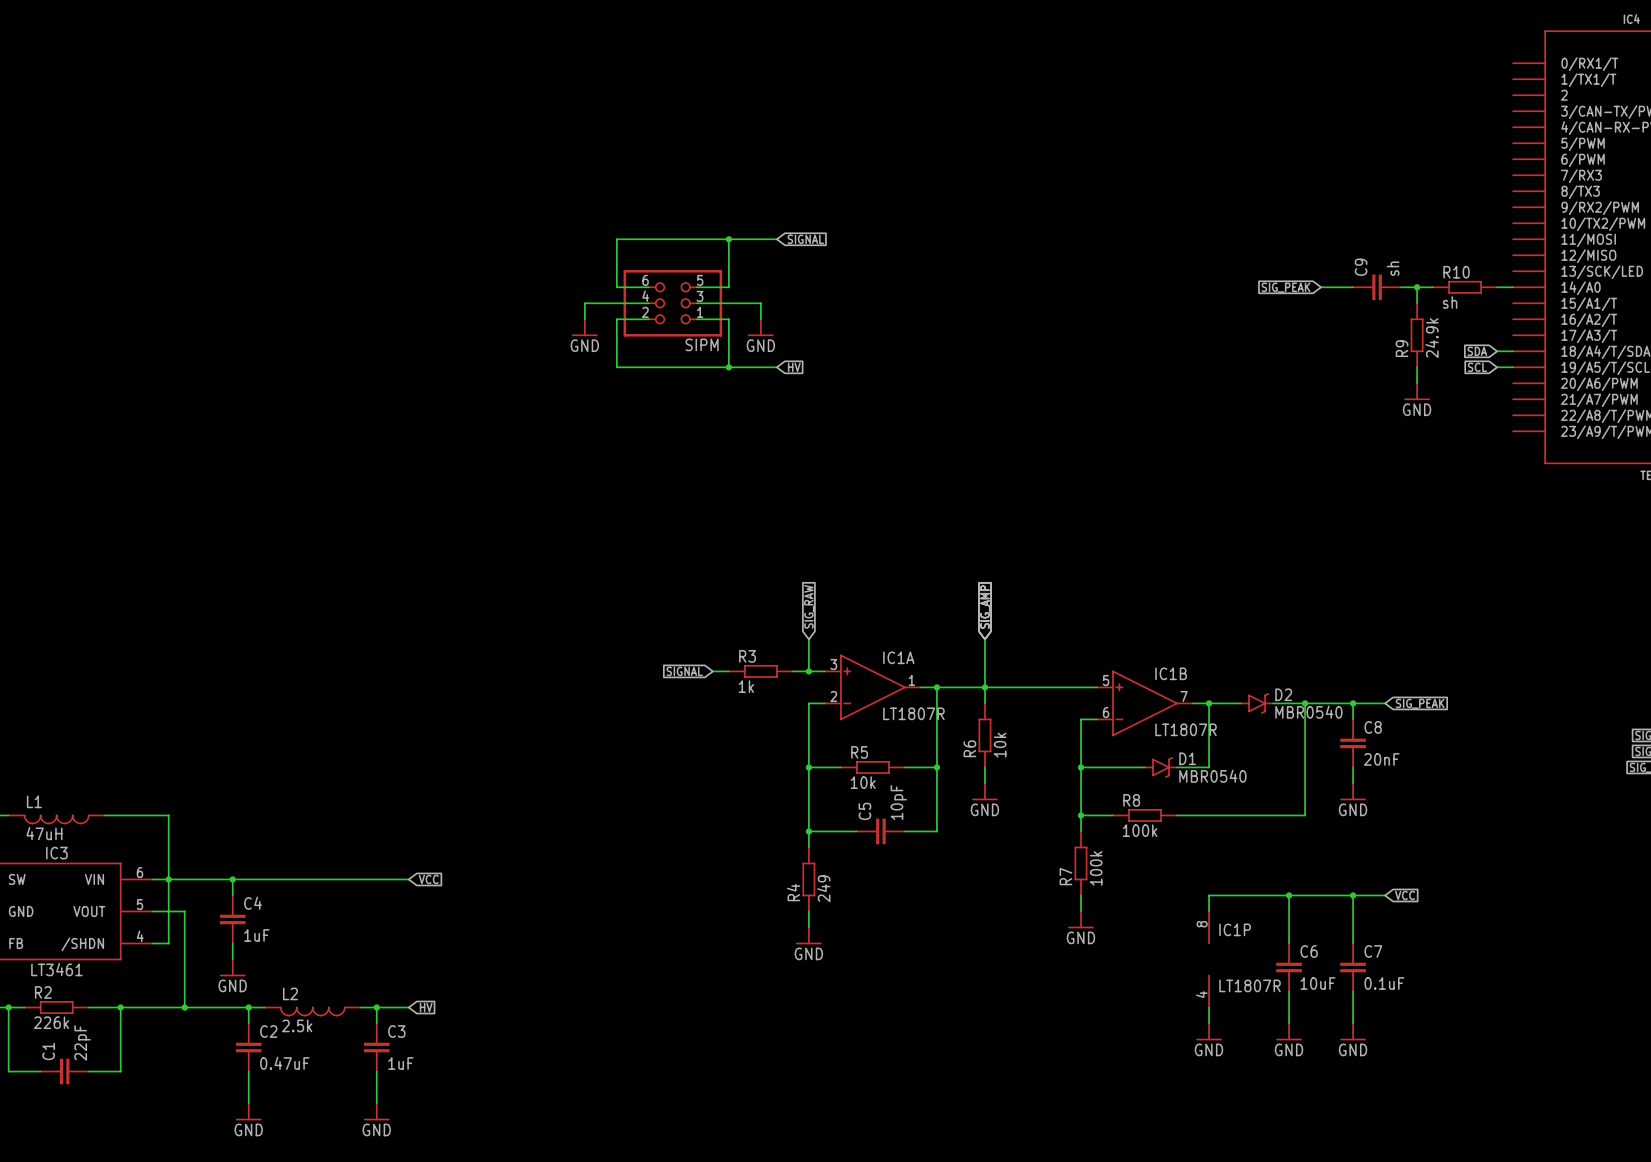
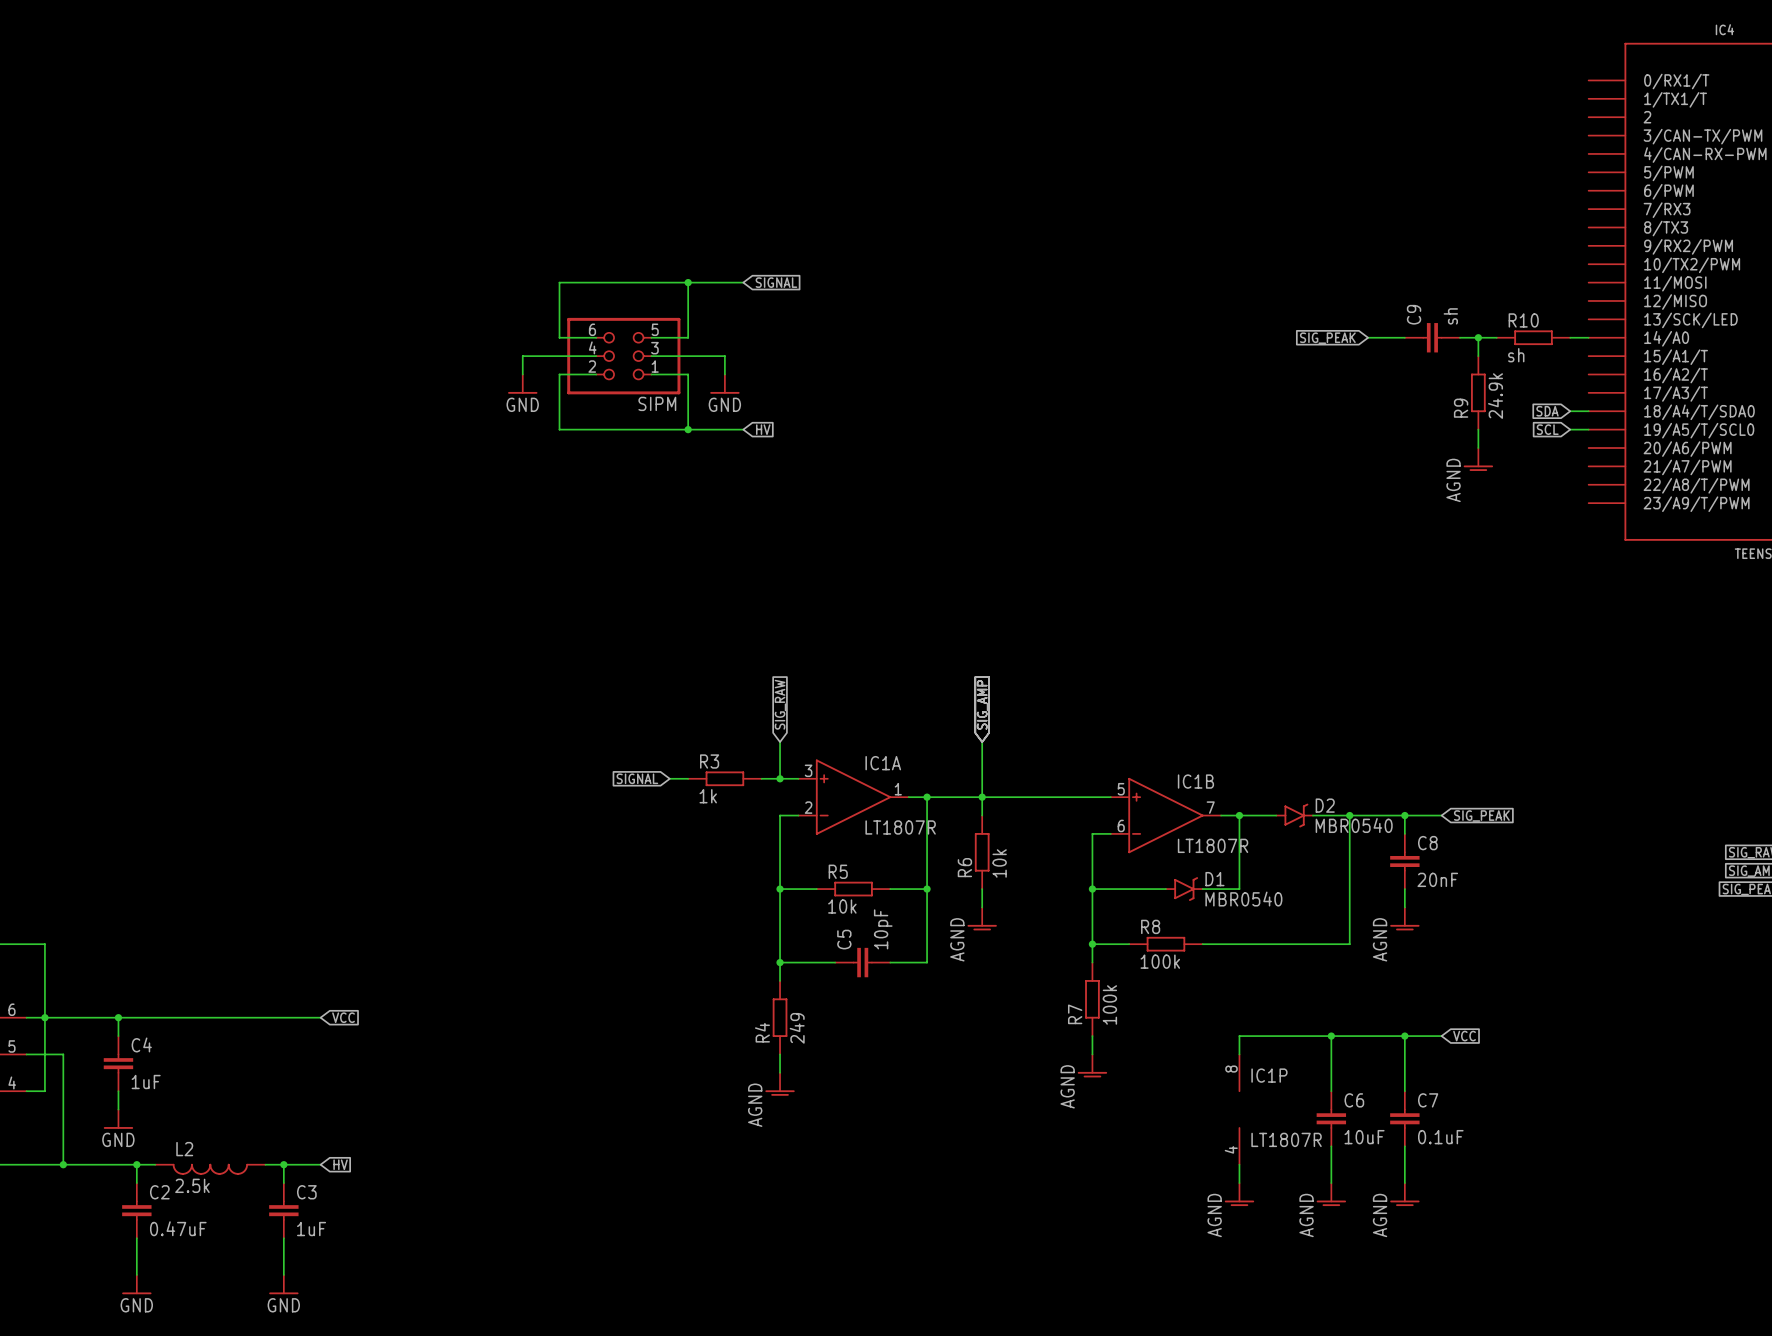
power symbol: GND (1417, 391) -> AGND (1478, 459)
power symbol: GND (984, 791) -> AGND (982, 918)
power symbol: GND (1353, 791) -> AGND (1404, 918)
power symbol: GND (1080, 919) -> AGND (1092, 1065)
power symbol: GND (808, 935) -> AGND (780, 1084)
power symbol: GND (1209, 1031) -> AGND (1239, 1194)
power symbol: GND (1289, 1031) -> AGND (1331, 1194)
power symbol: GND (1353, 1031) -> AGND (1404, 1194)

